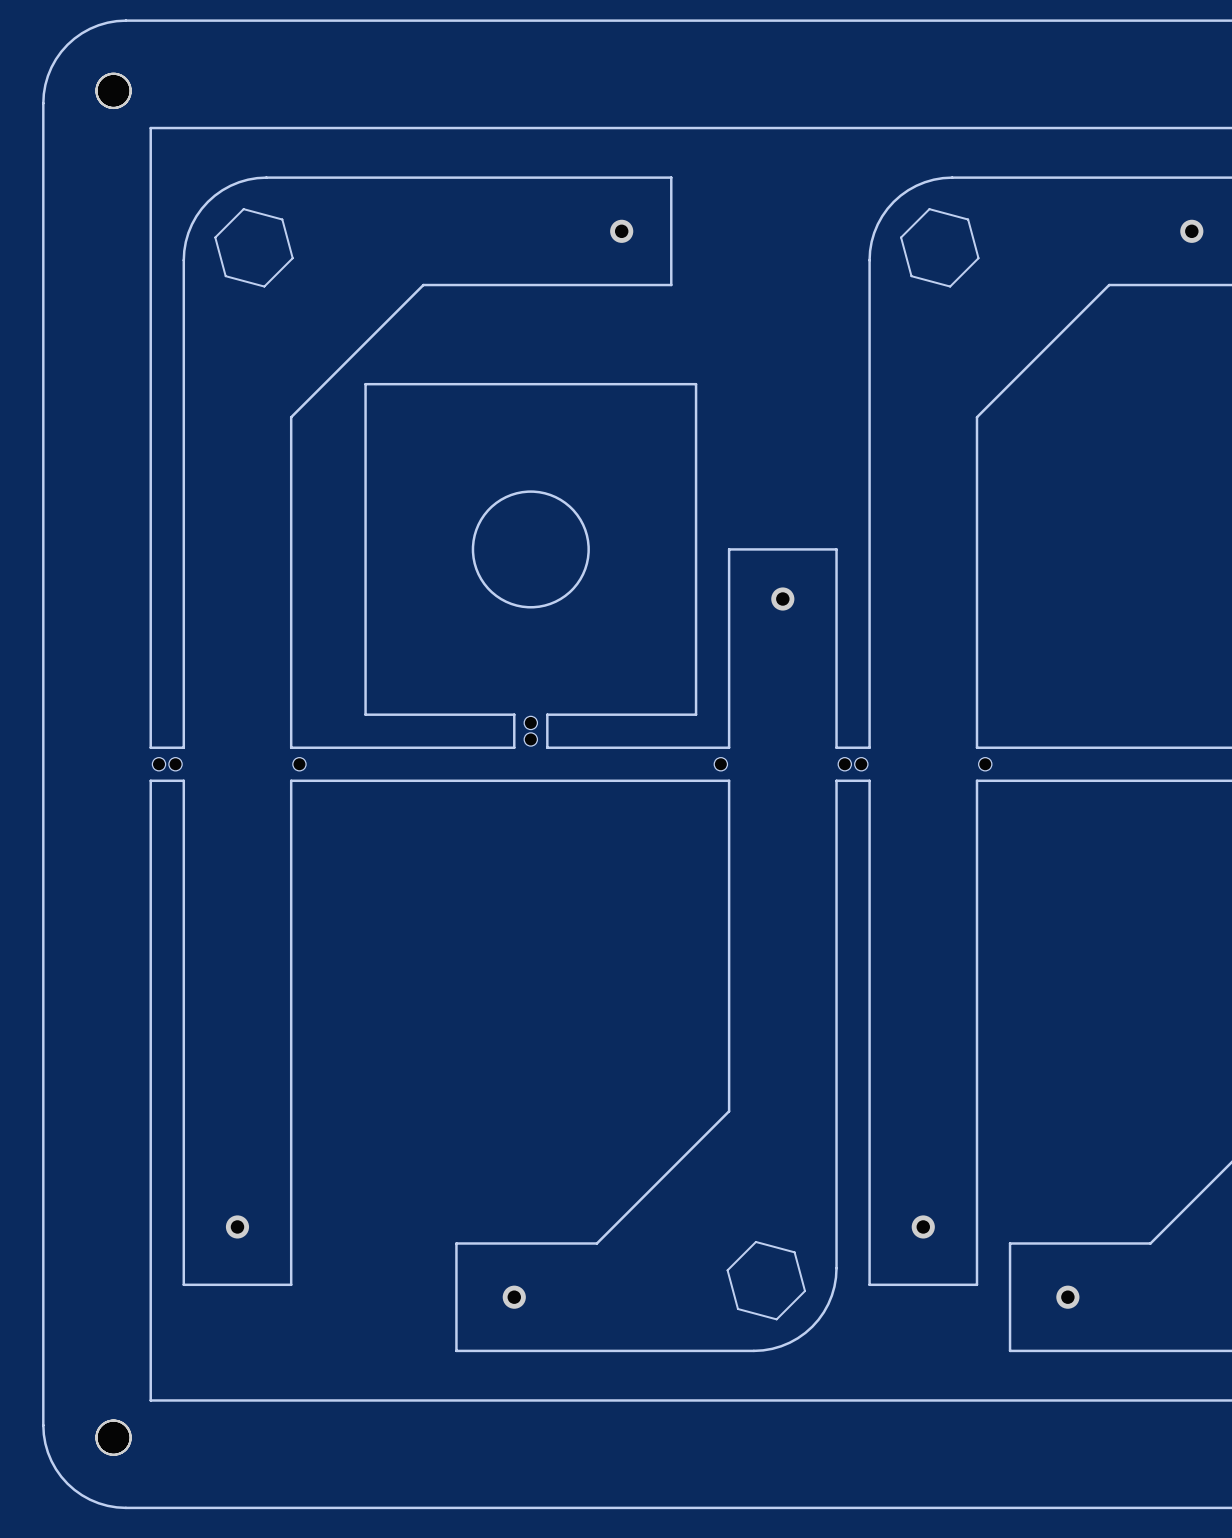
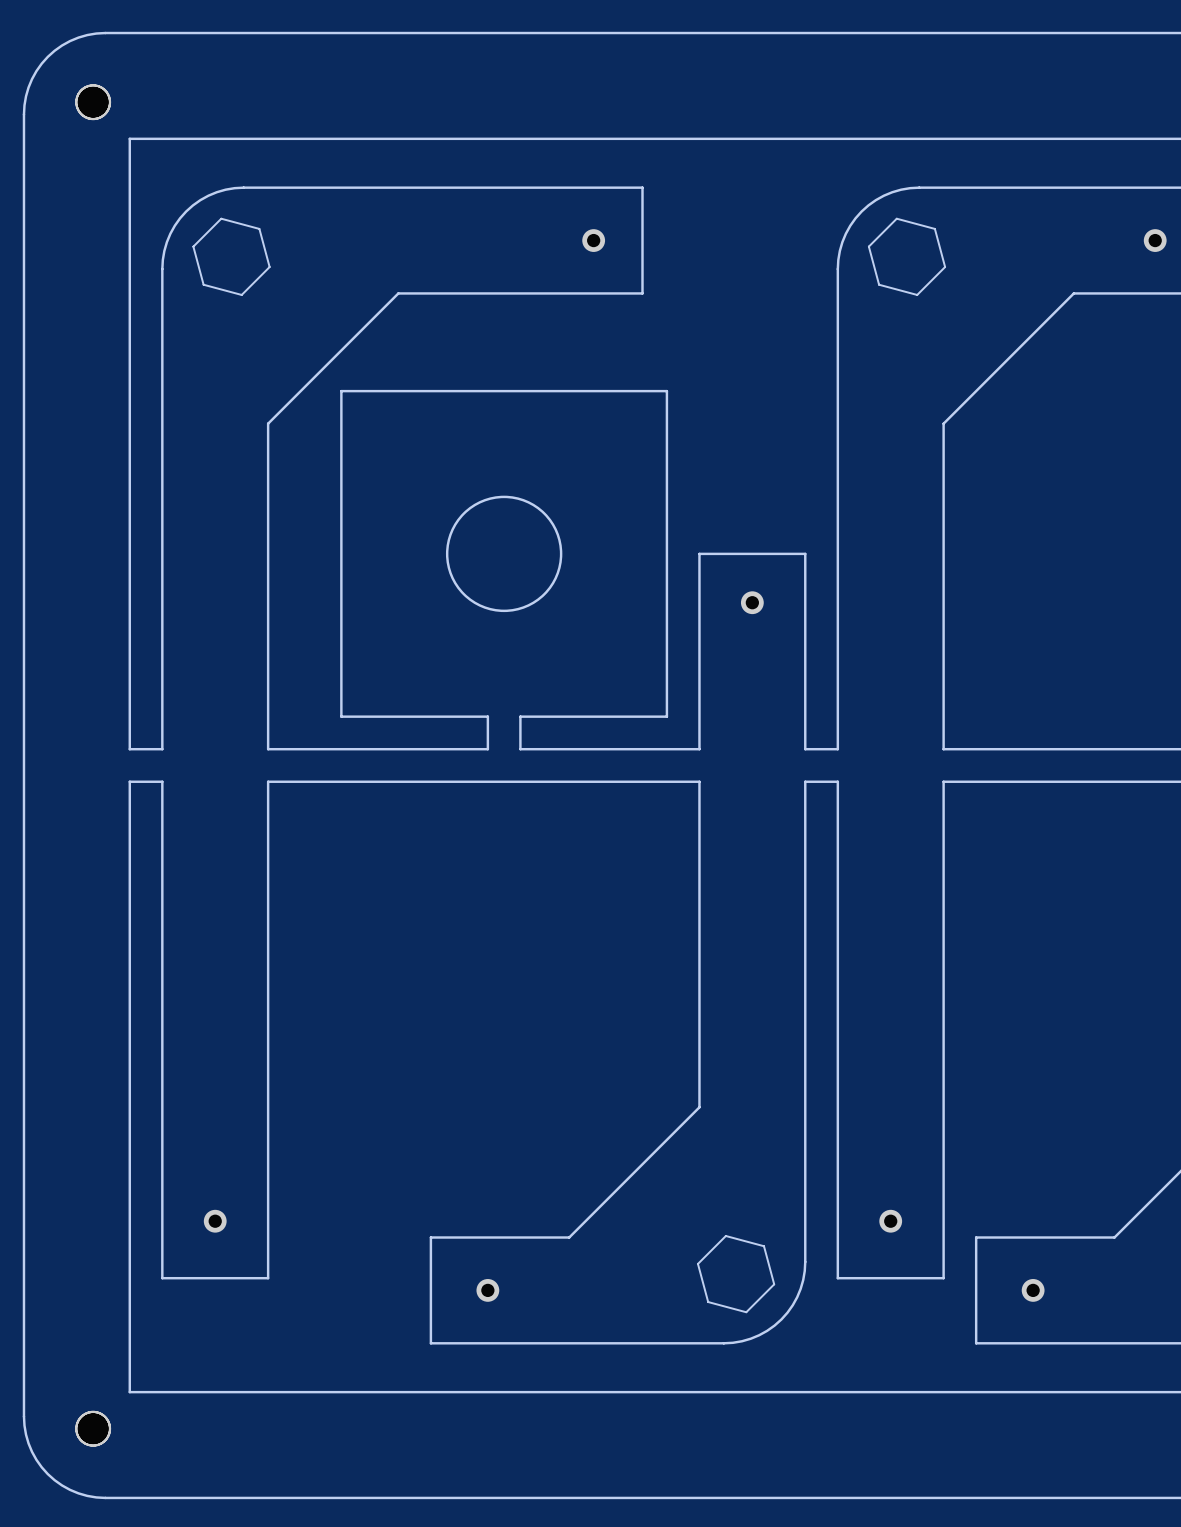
part: (530, 722) -> none
part: (530, 739) -> none
part: (158, 764) -> none
part: (175, 764) -> none
part: (299, 764) -> none
part: (720, 764) -> none
part: (844, 764) -> none
part: (861, 764) -> none
part: (985, 764) -> none

